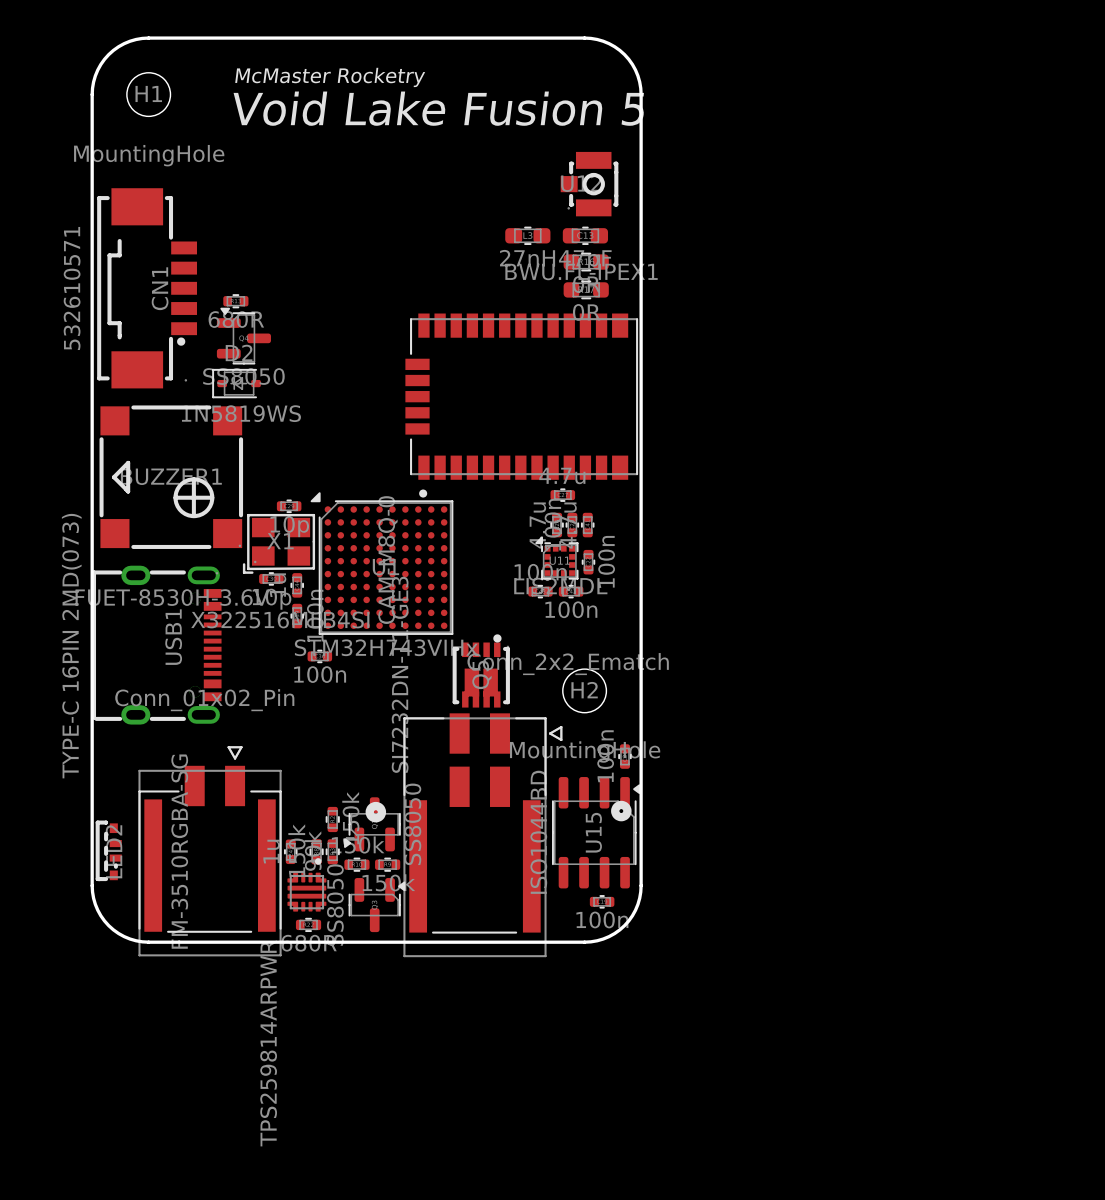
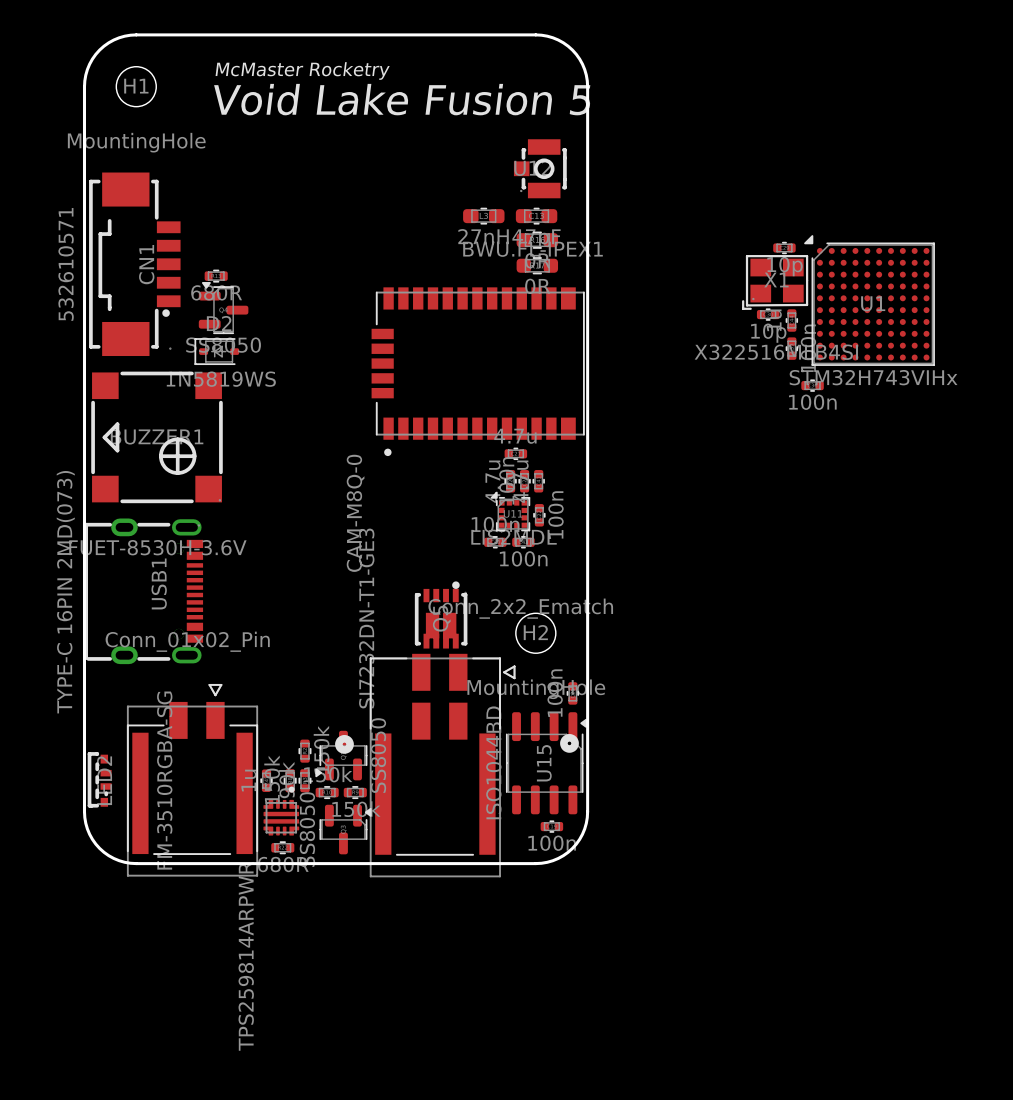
part position: (289, 506) -> (784, 247)
X1 position: (278, 543) -> (775, 282)
U1 position: (381, 563) -> (869, 300)
part position: (271, 578) -> (768, 314)
part position: (297, 585) -> (791, 320)
part position: (297, 616) -> (791, 348)
part position: (319, 656) -> (812, 385)

